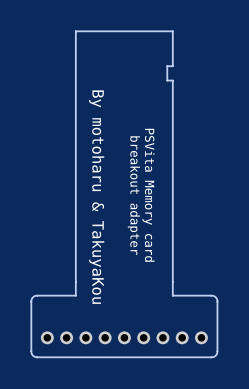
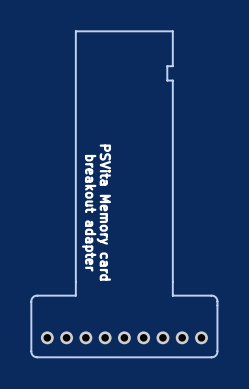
text position: breakout adapter (133, 195) -> breakout adapter (89, 213)
text position: PSVita Memory card (148, 195) -> PSVita Memory card (103, 212)
text: By motoharu & TakuyaKou (96, 197) -> none

